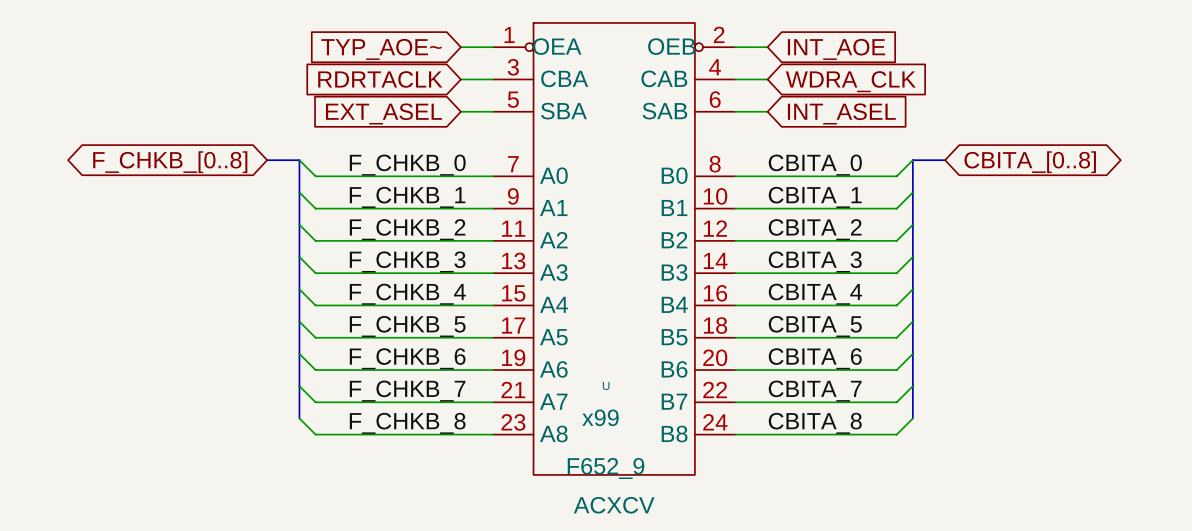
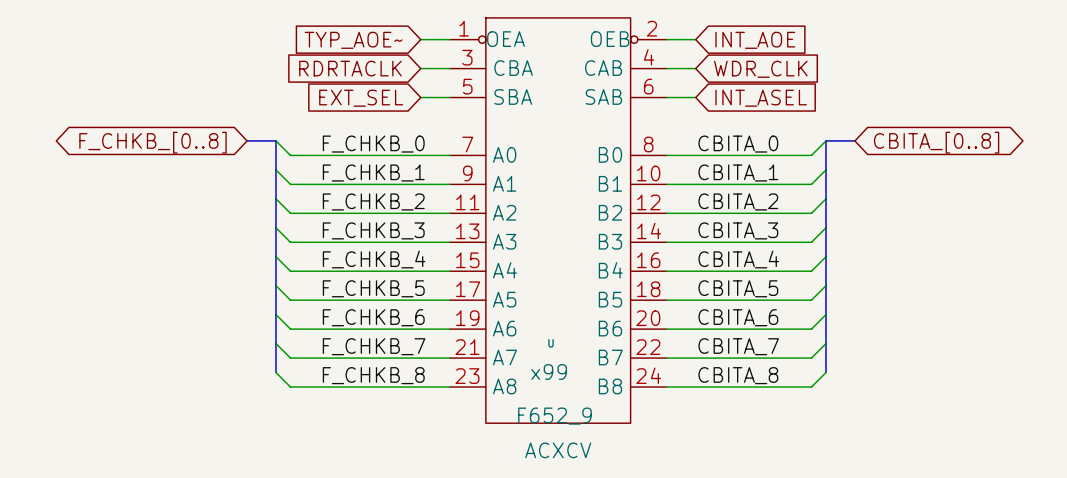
global label: WDRA_CLK (850, 81) -> WDR_CLK (760, 69)
global label: EXT_ASEL (383, 113) -> EXT_SEL (361, 98)

